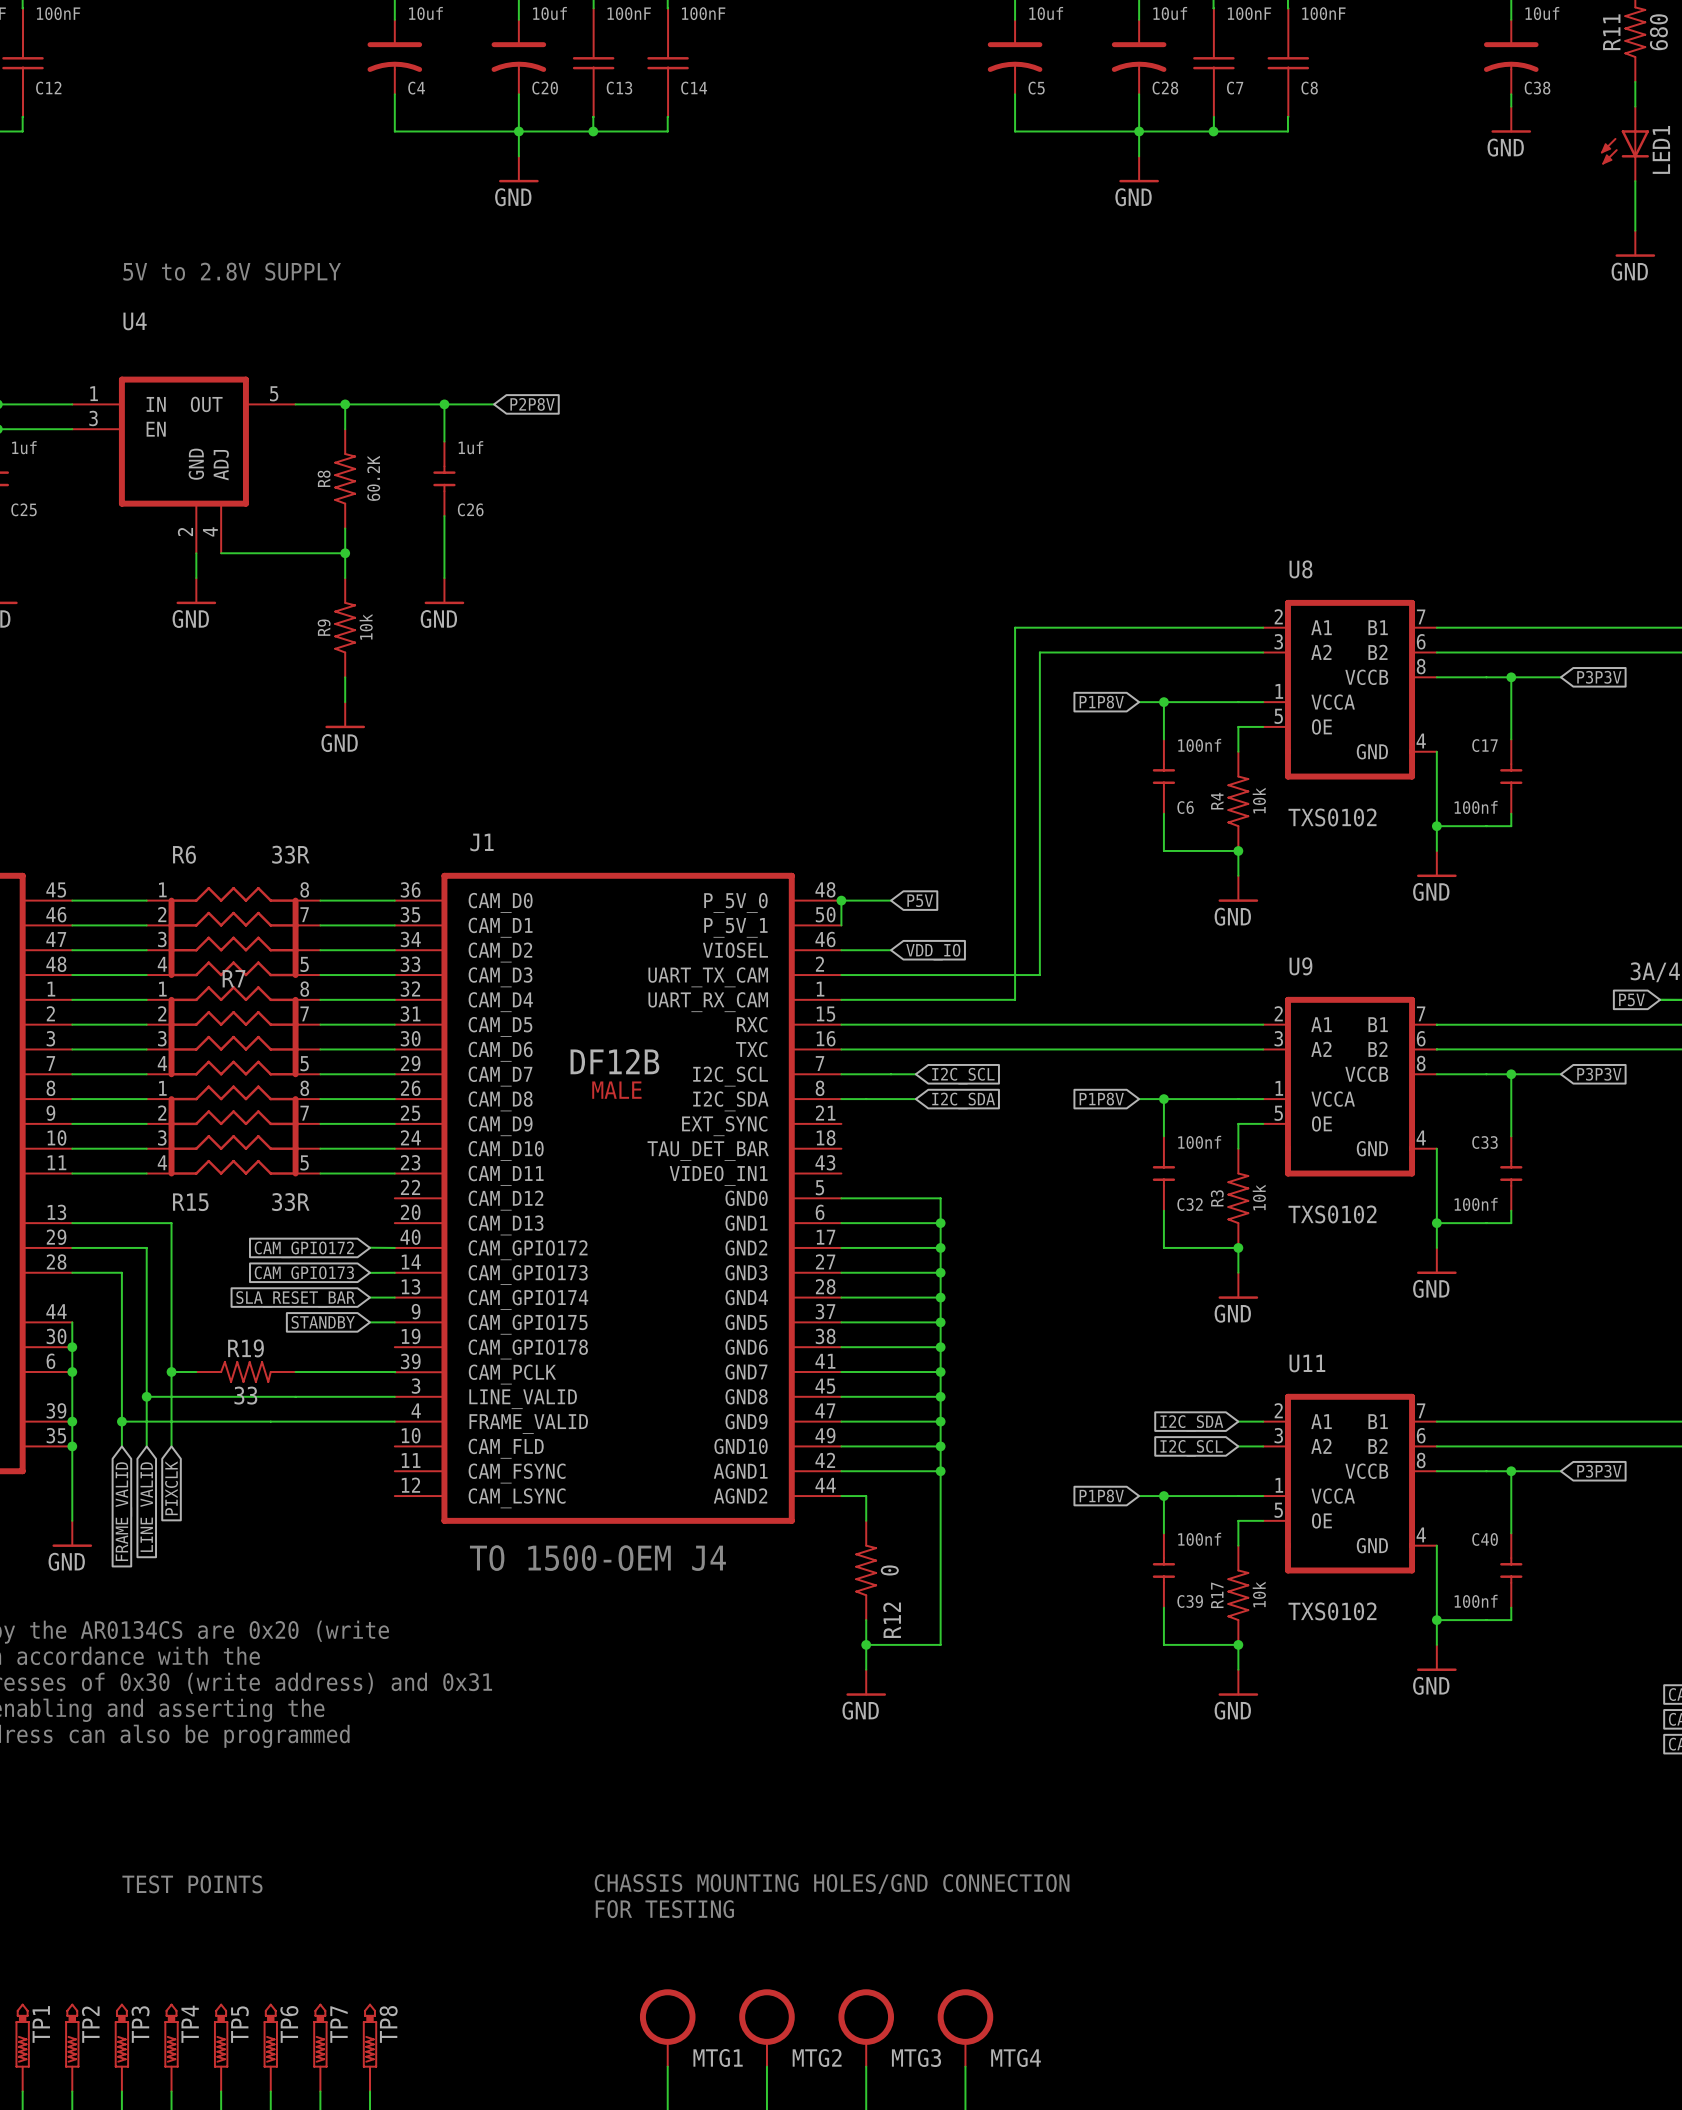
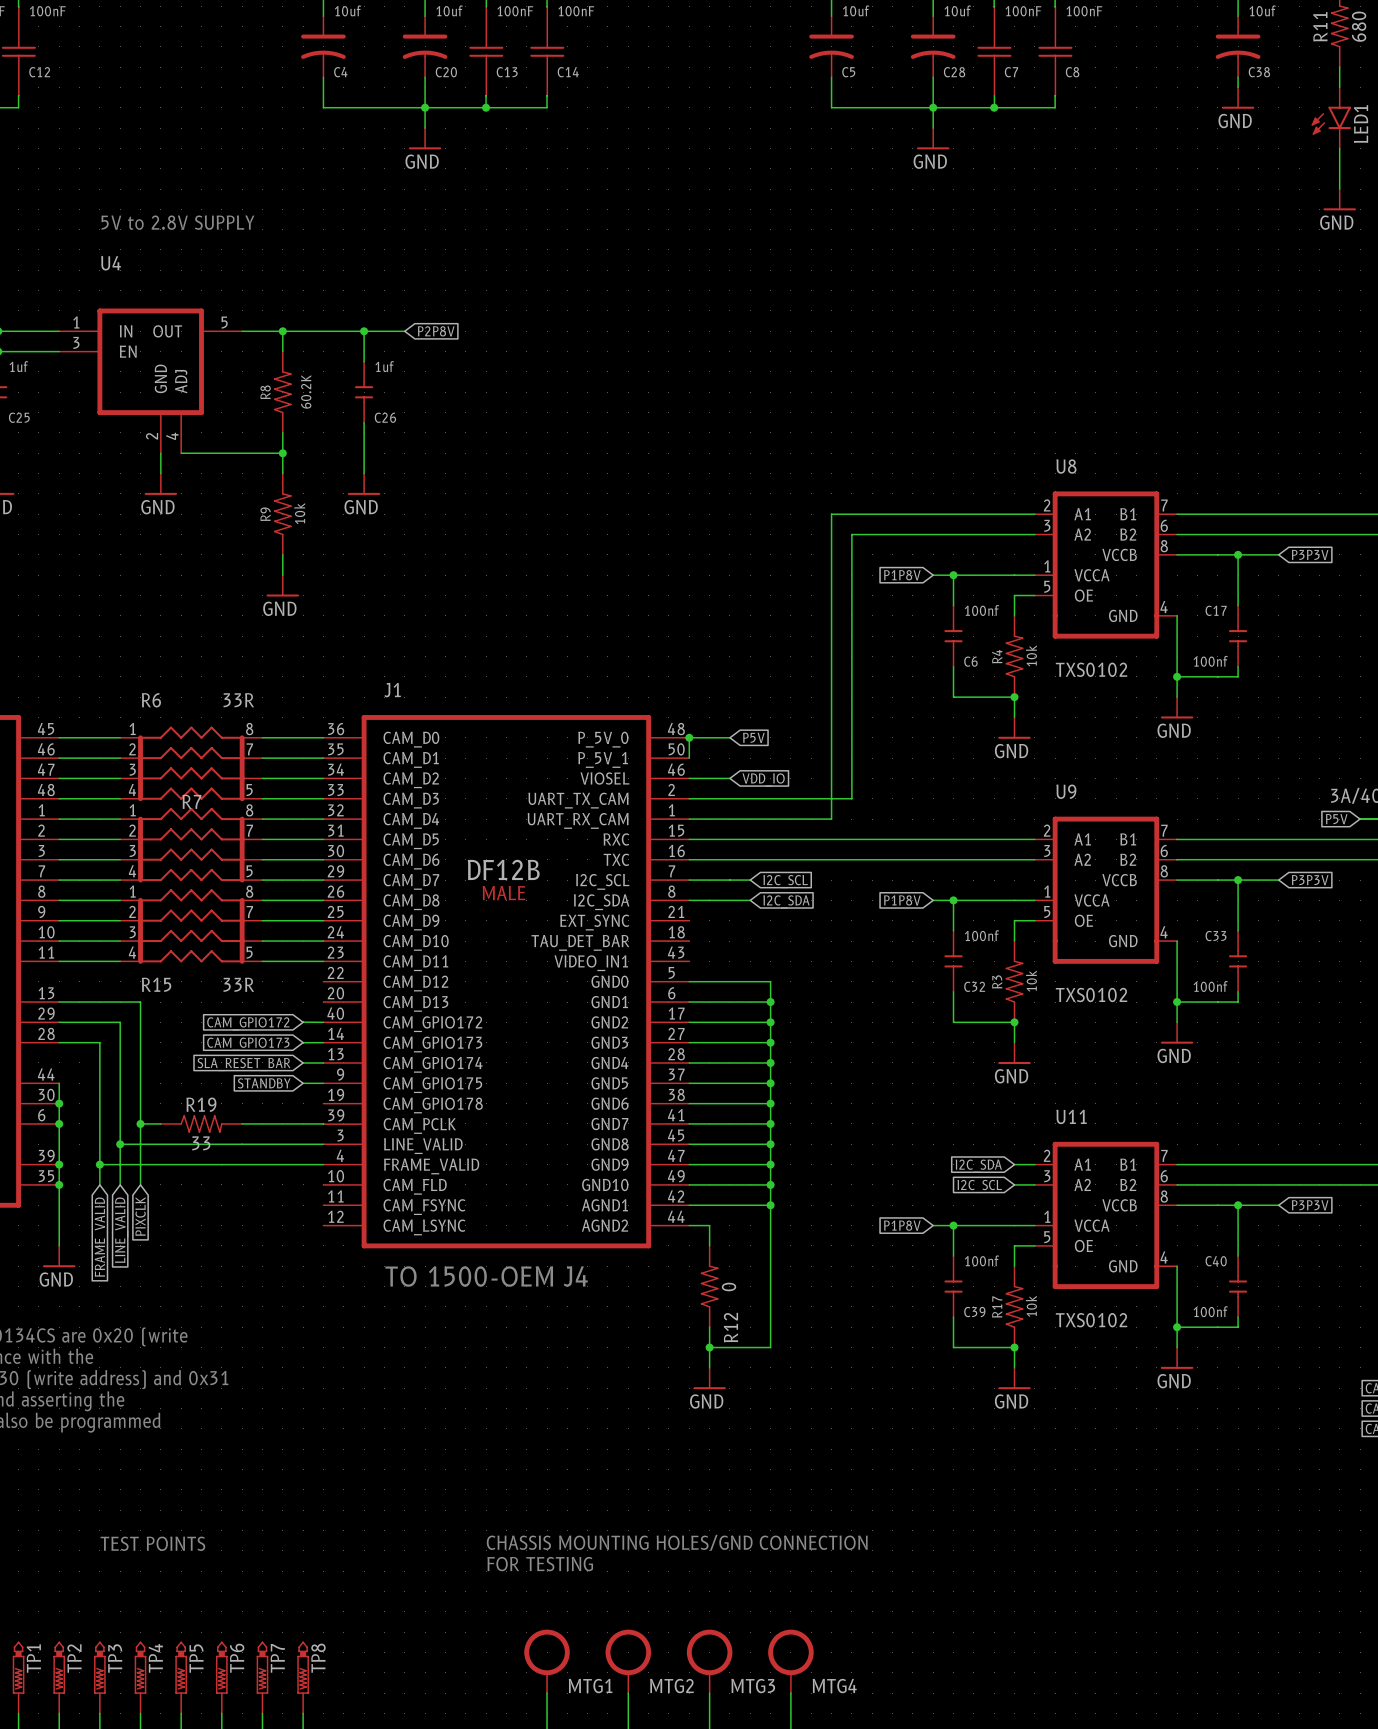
LED1 symbol: [1601, 106, 1649, 182] -> [1311, 87, 1351, 149]

